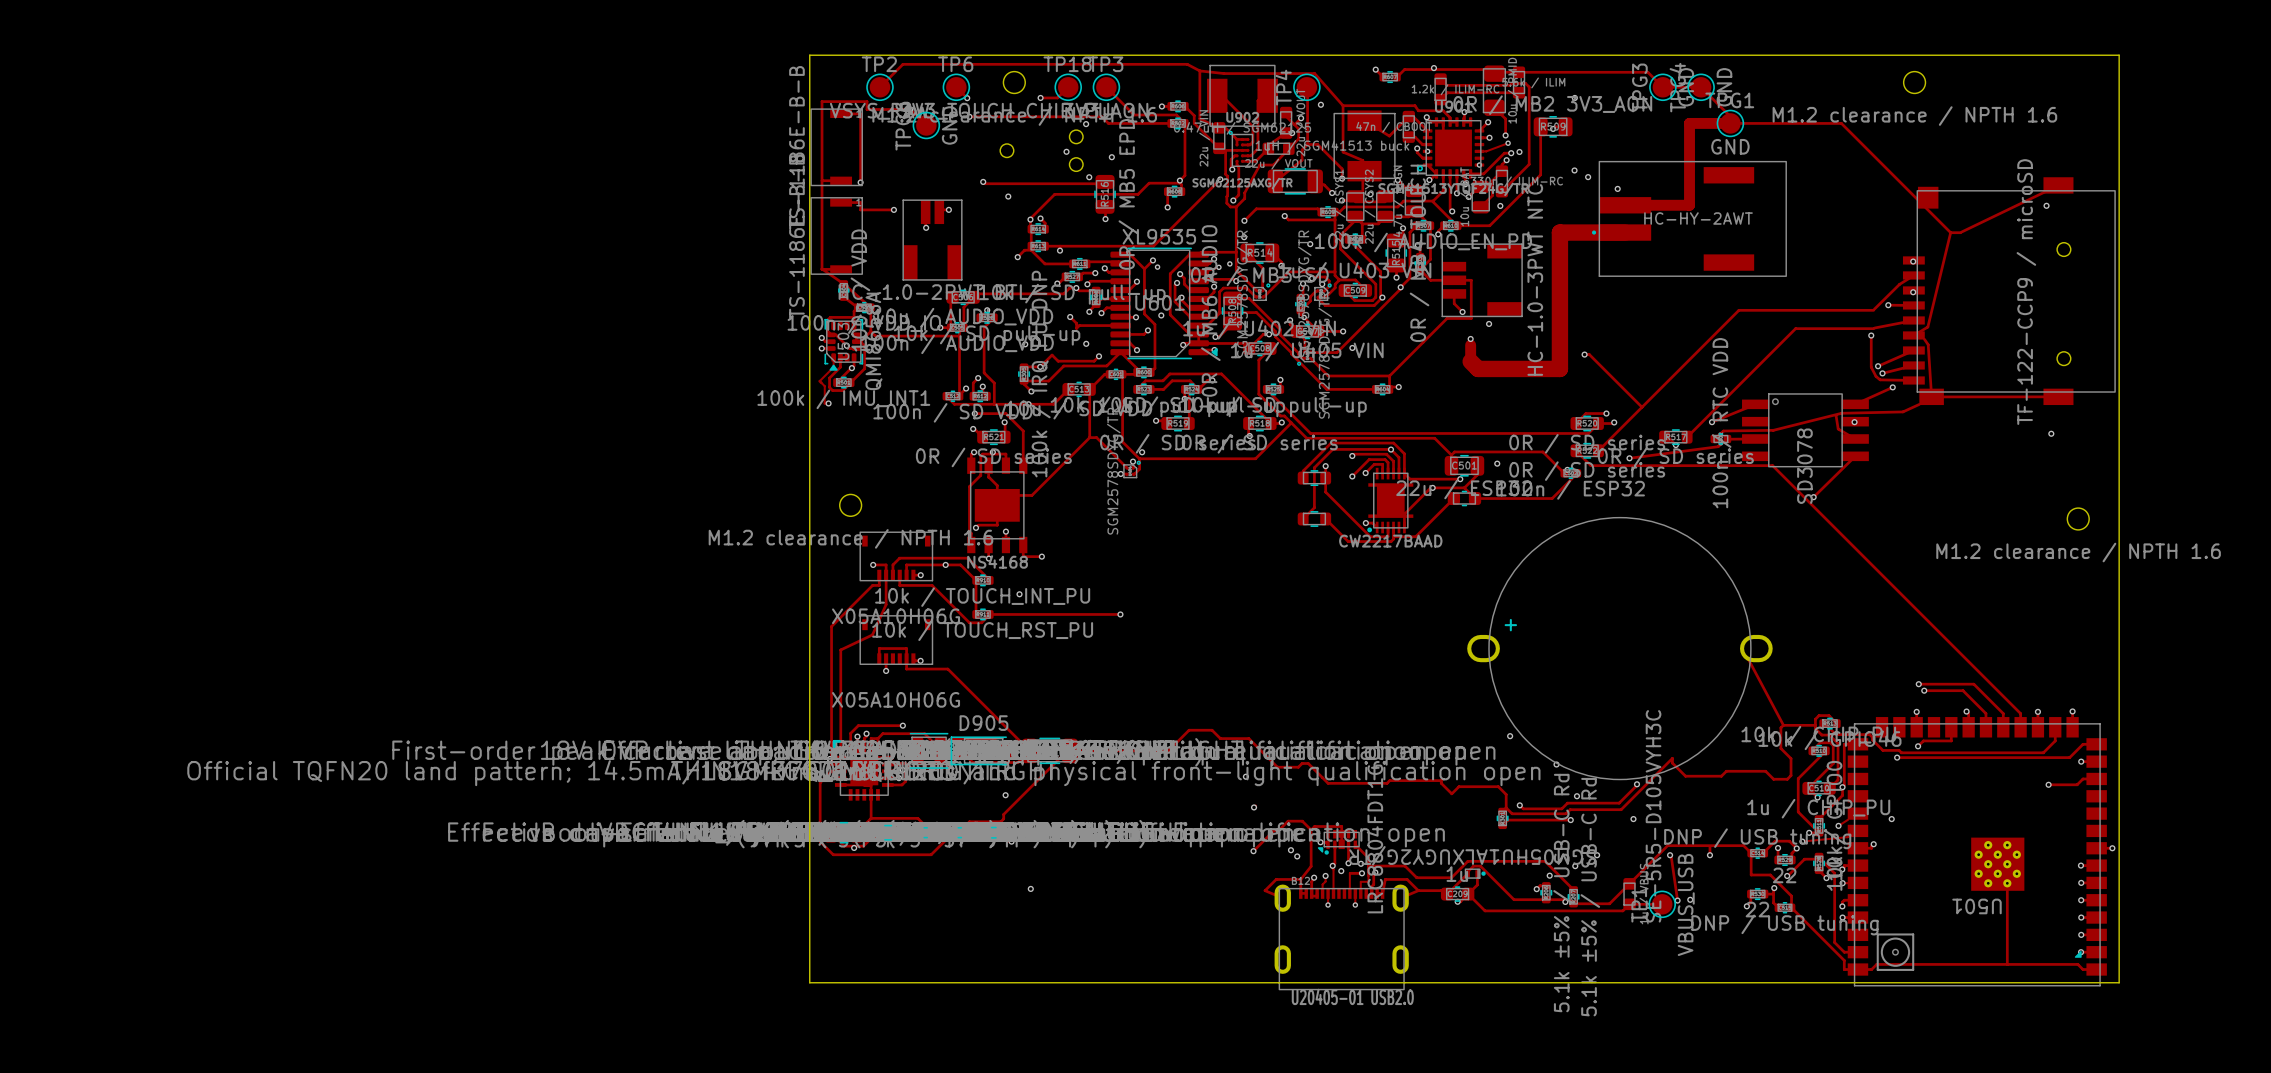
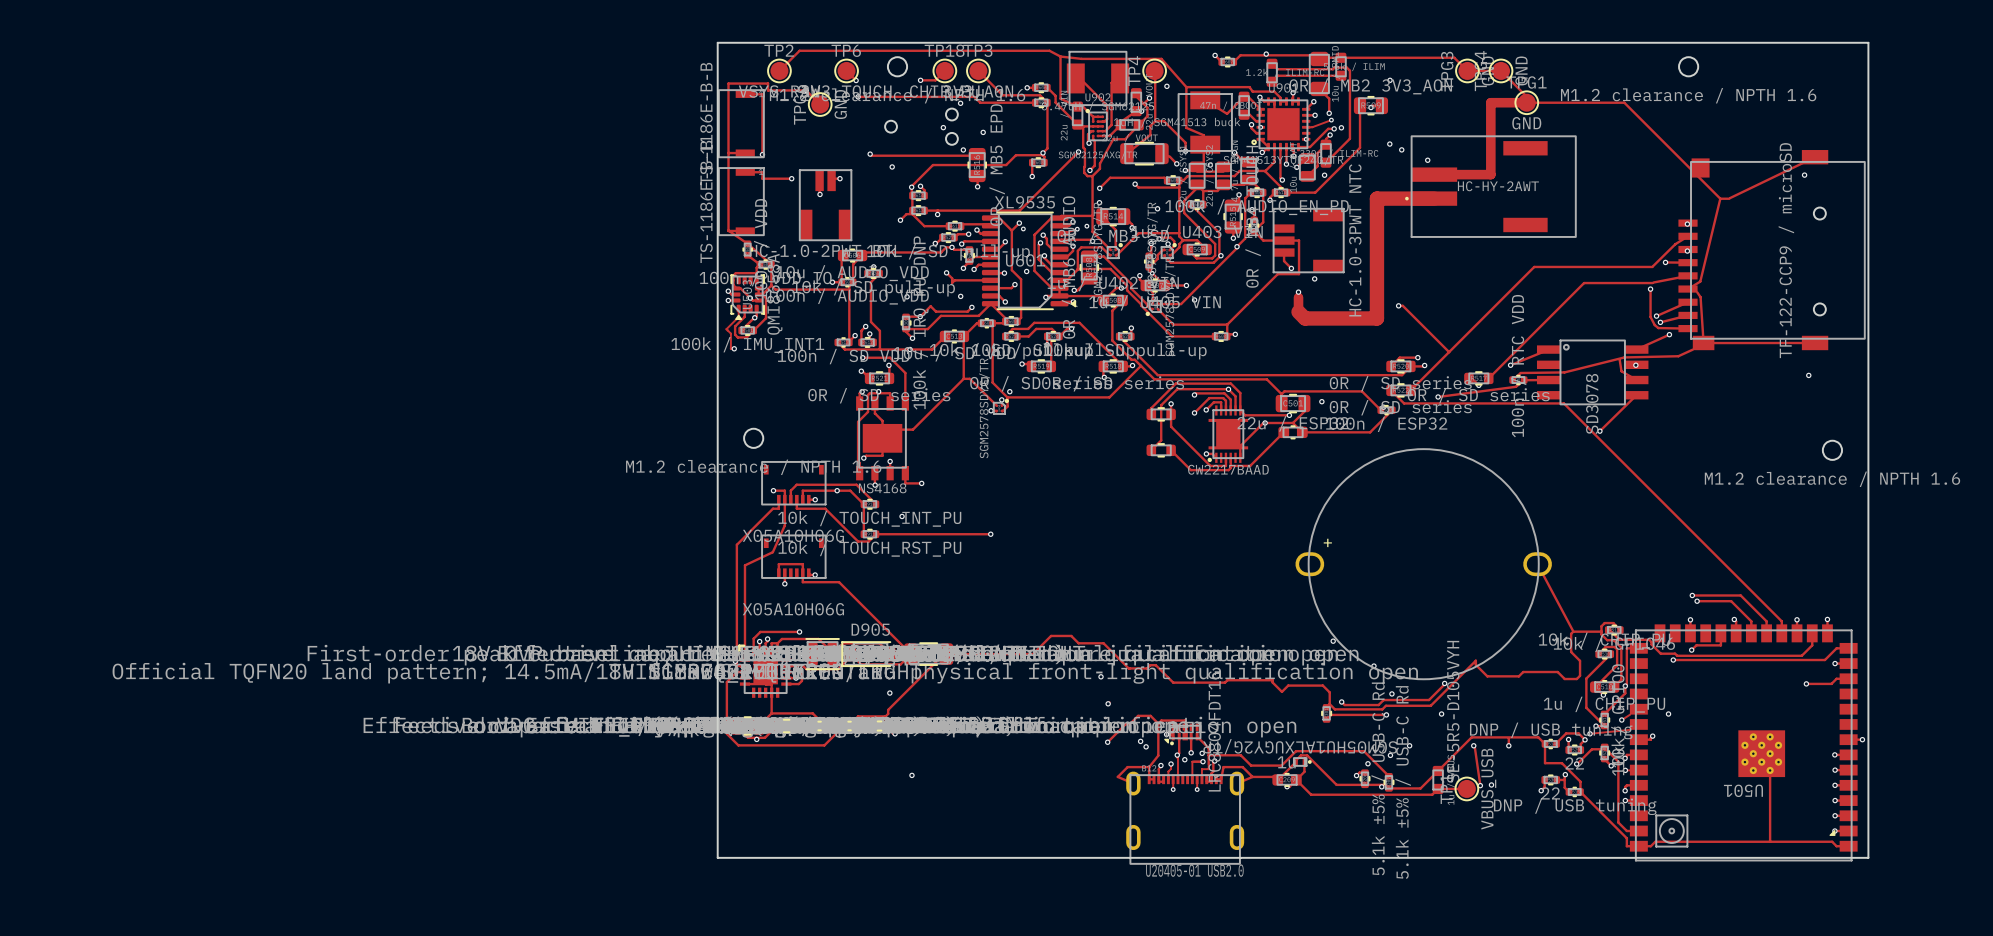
part footprint: [1467, 516, 1773, 781] -> [1295, 448, 1552, 680]
part value: SE-5R5-D105VYH3C (1653, 816) -> SE-5R5-D105VYH (1453, 711)

